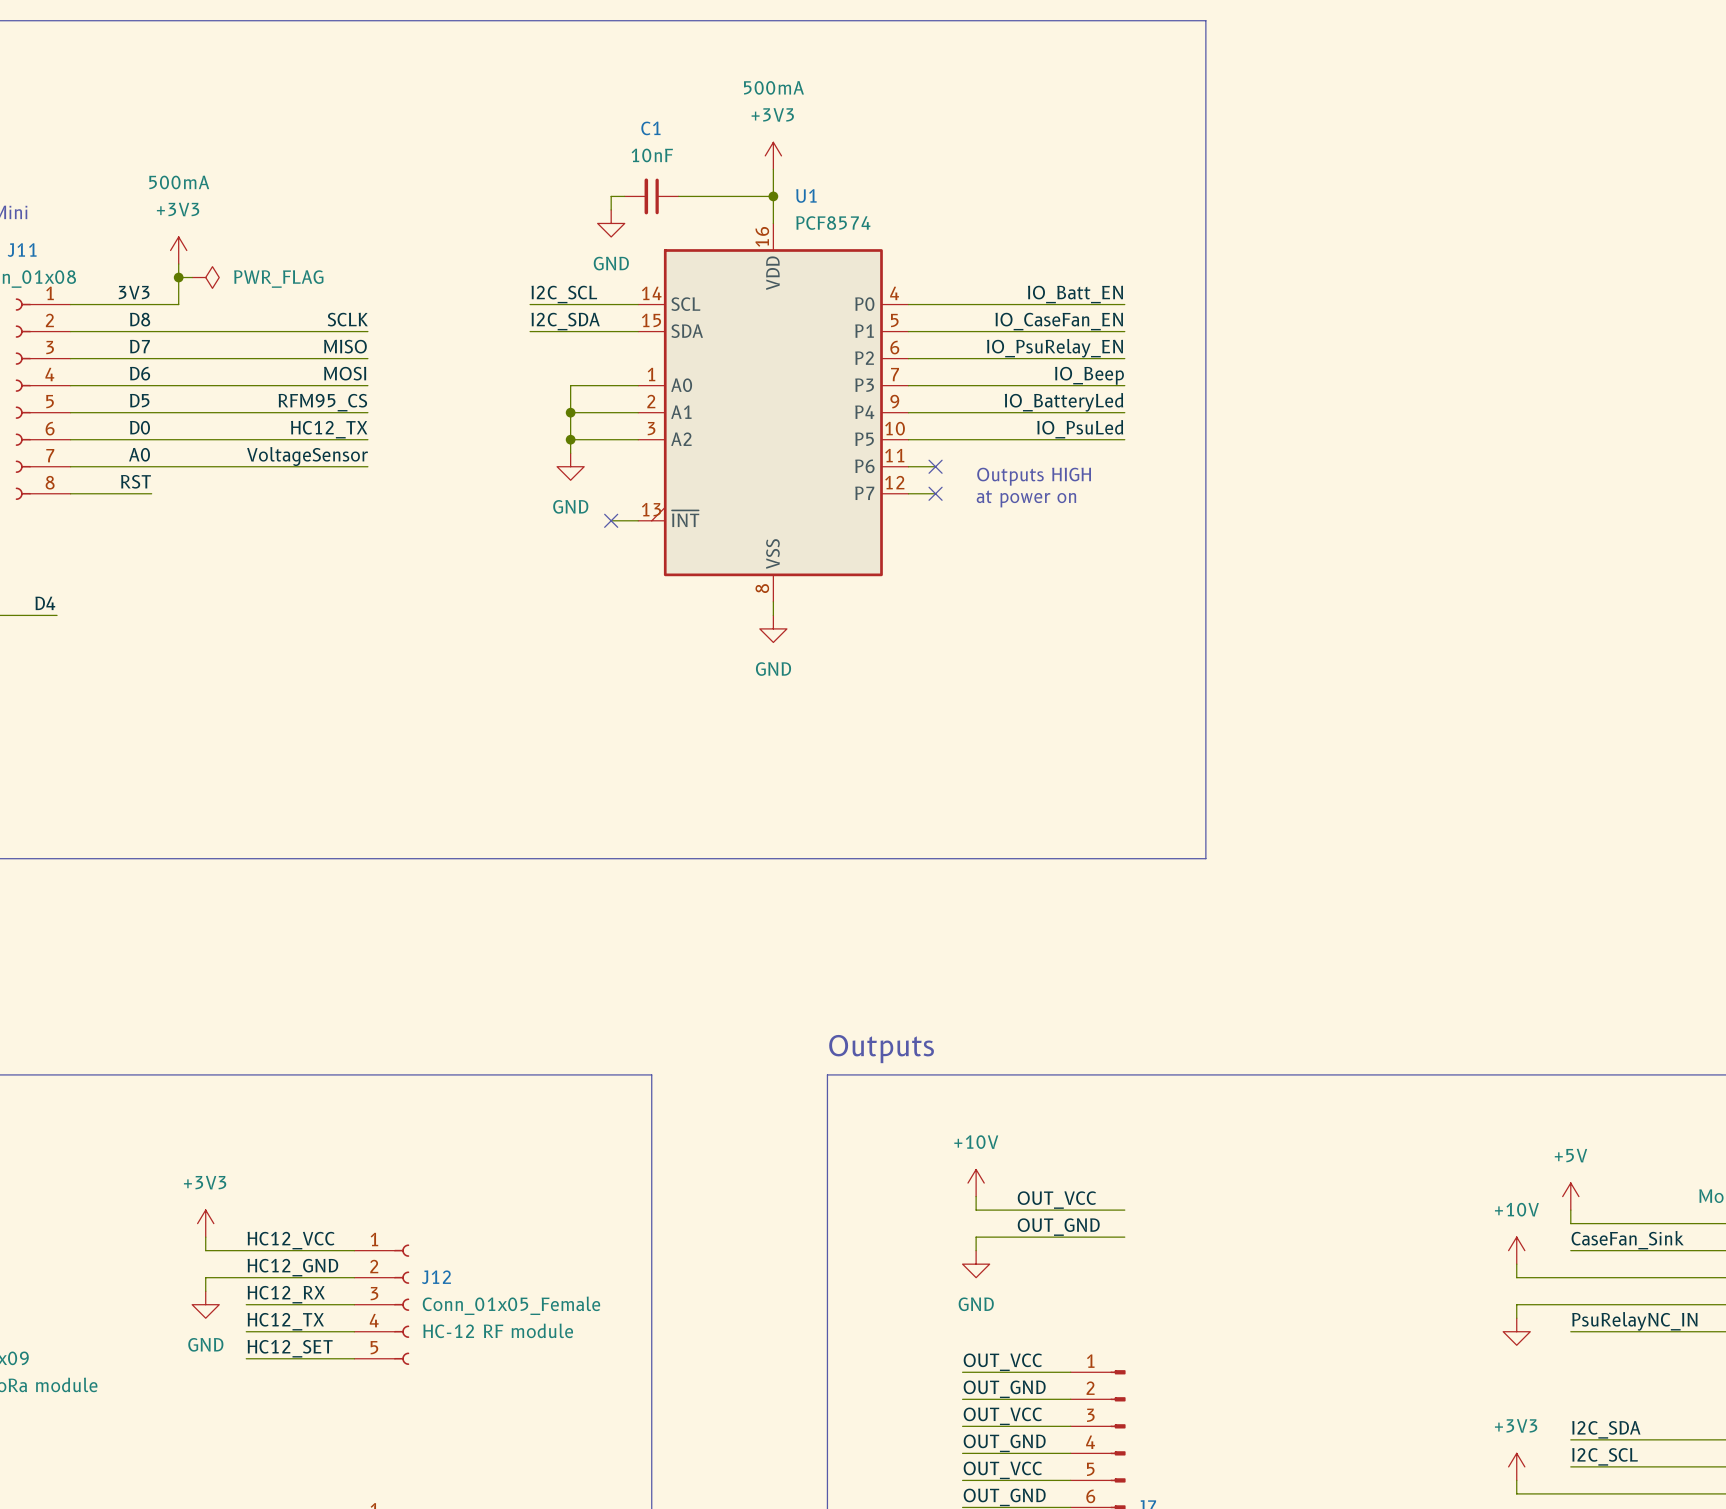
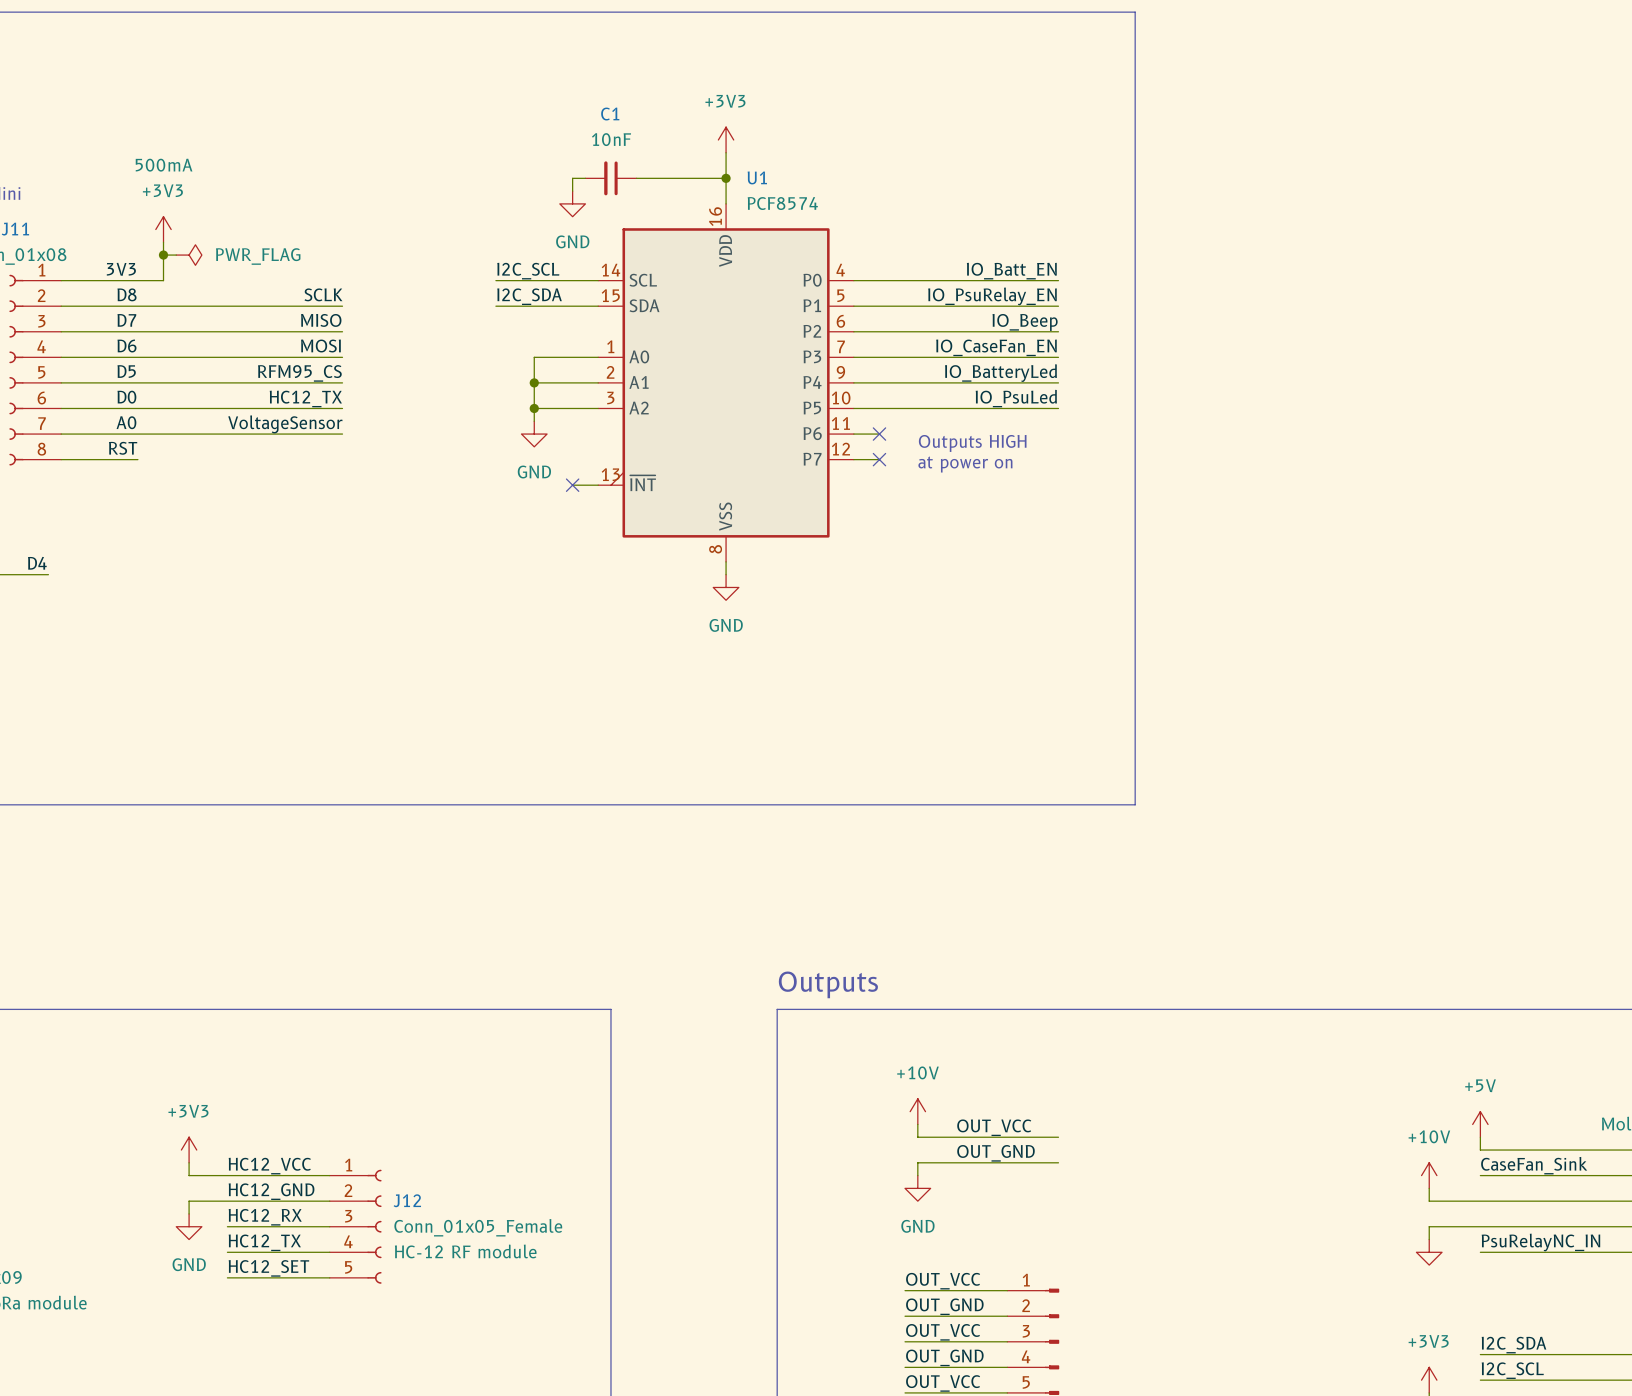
power symbol text: 500mA (773, 87) -> none
label: IO_CaseFan_EN (1059, 321) -> IO_PsuRelay_EN (992, 296)
label: IO_PsuRelay_EN (1055, 348) -> IO_Beep (1025, 322)
label: IO_Beep (1089, 375) -> IO_CaseFan_EN (996, 347)

